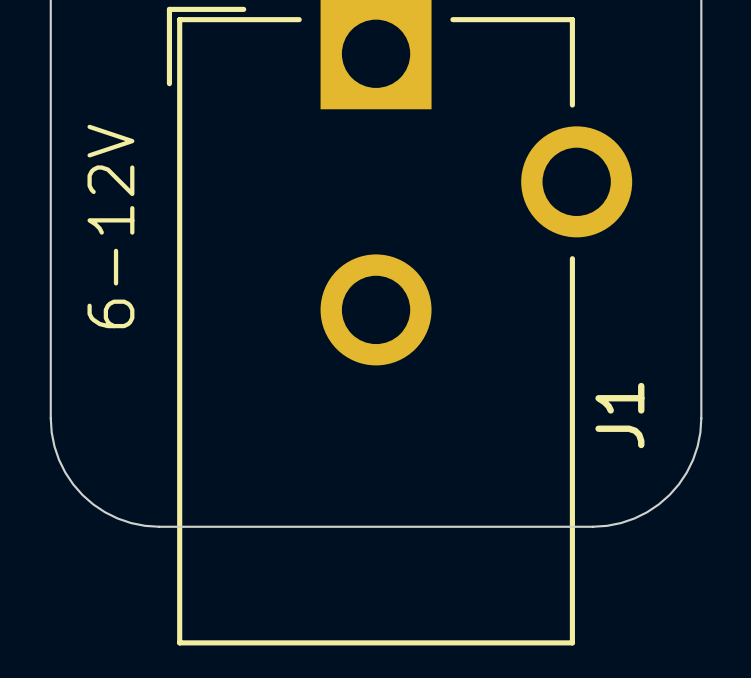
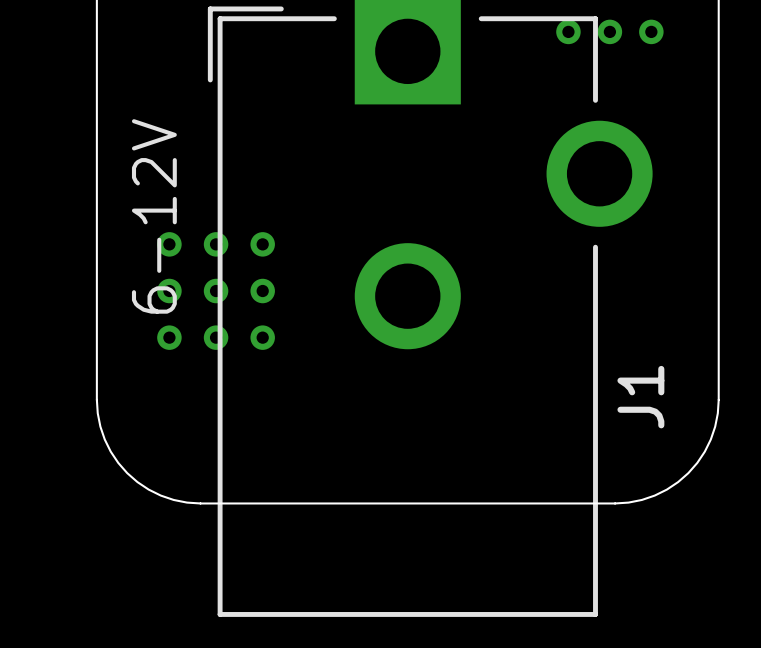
via: none -> (568, 31)
via: none -> (609, 31)
via: none -> (651, 31)
via: none -> (169, 244)
via: none -> (216, 244)
via: none -> (262, 244)
via: none -> (169, 291)
via: none -> (216, 291)
via: none -> (262, 291)
via: none -> (169, 337)
via: none -> (216, 337)
via: none -> (262, 337)

